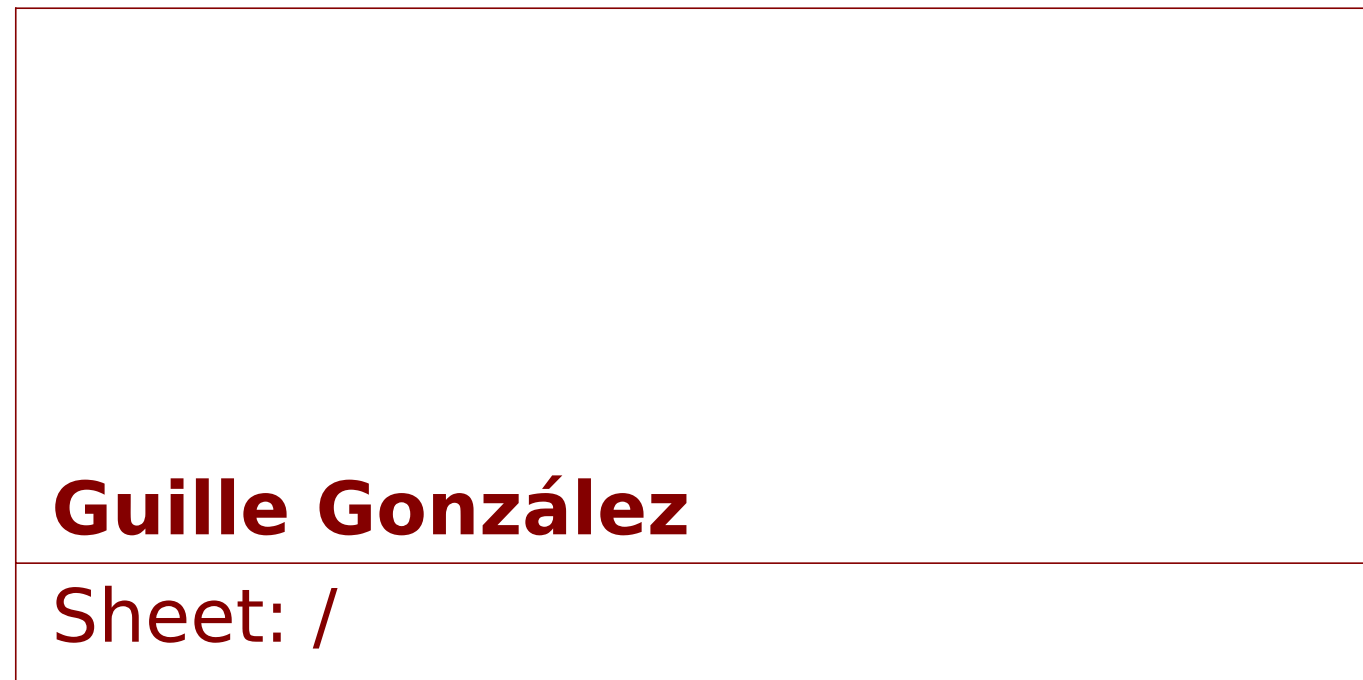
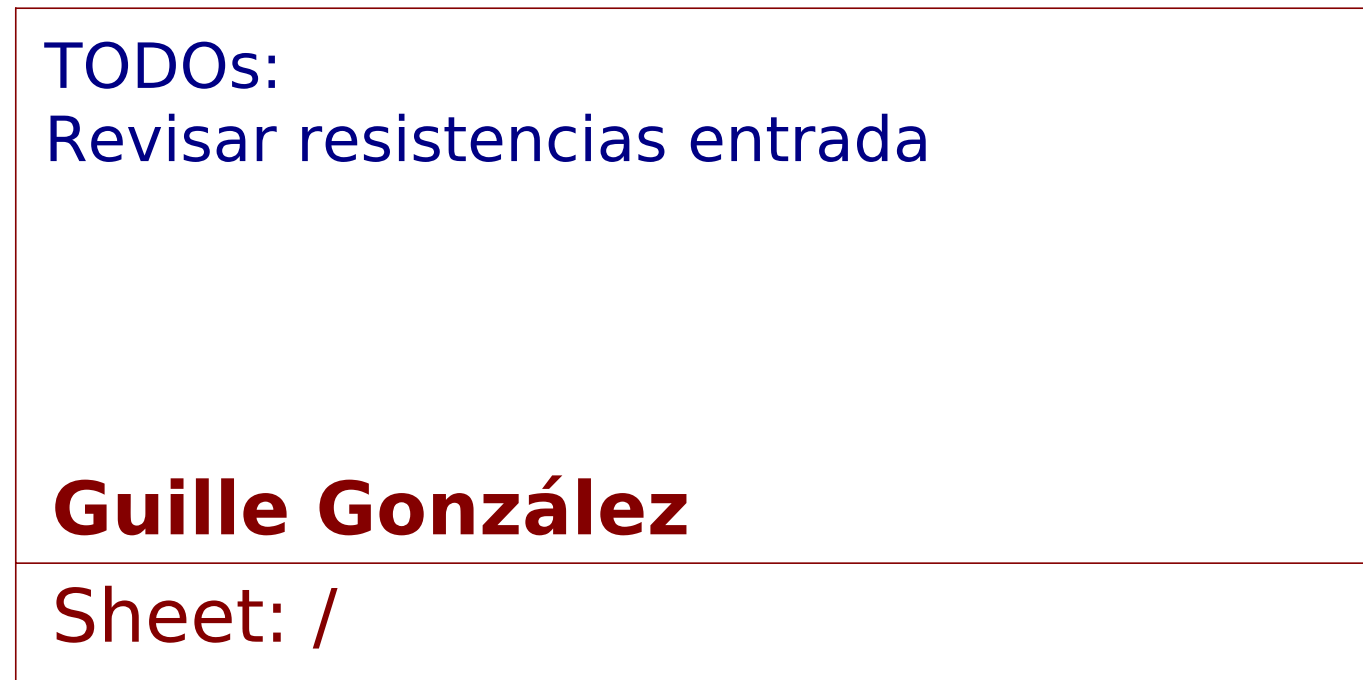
text: none -> TODOs: (159, 65)
text: none -> Revisar resistencias entrada (488, 137)

